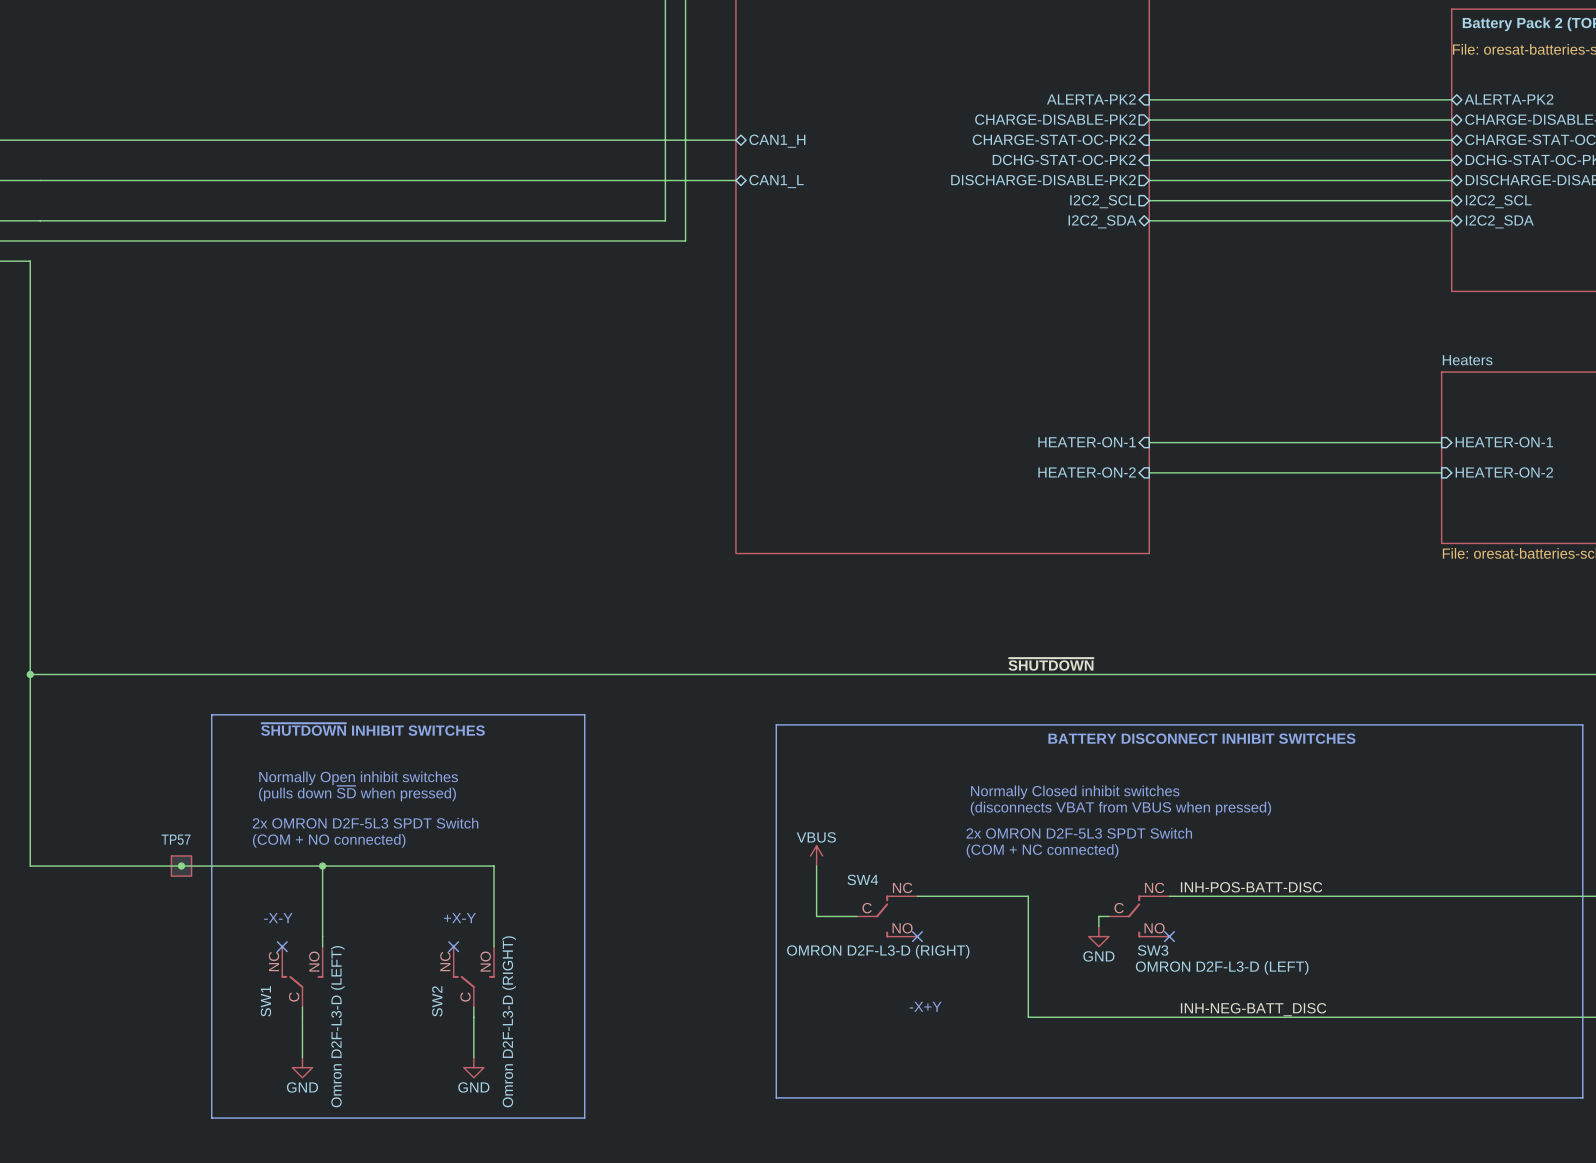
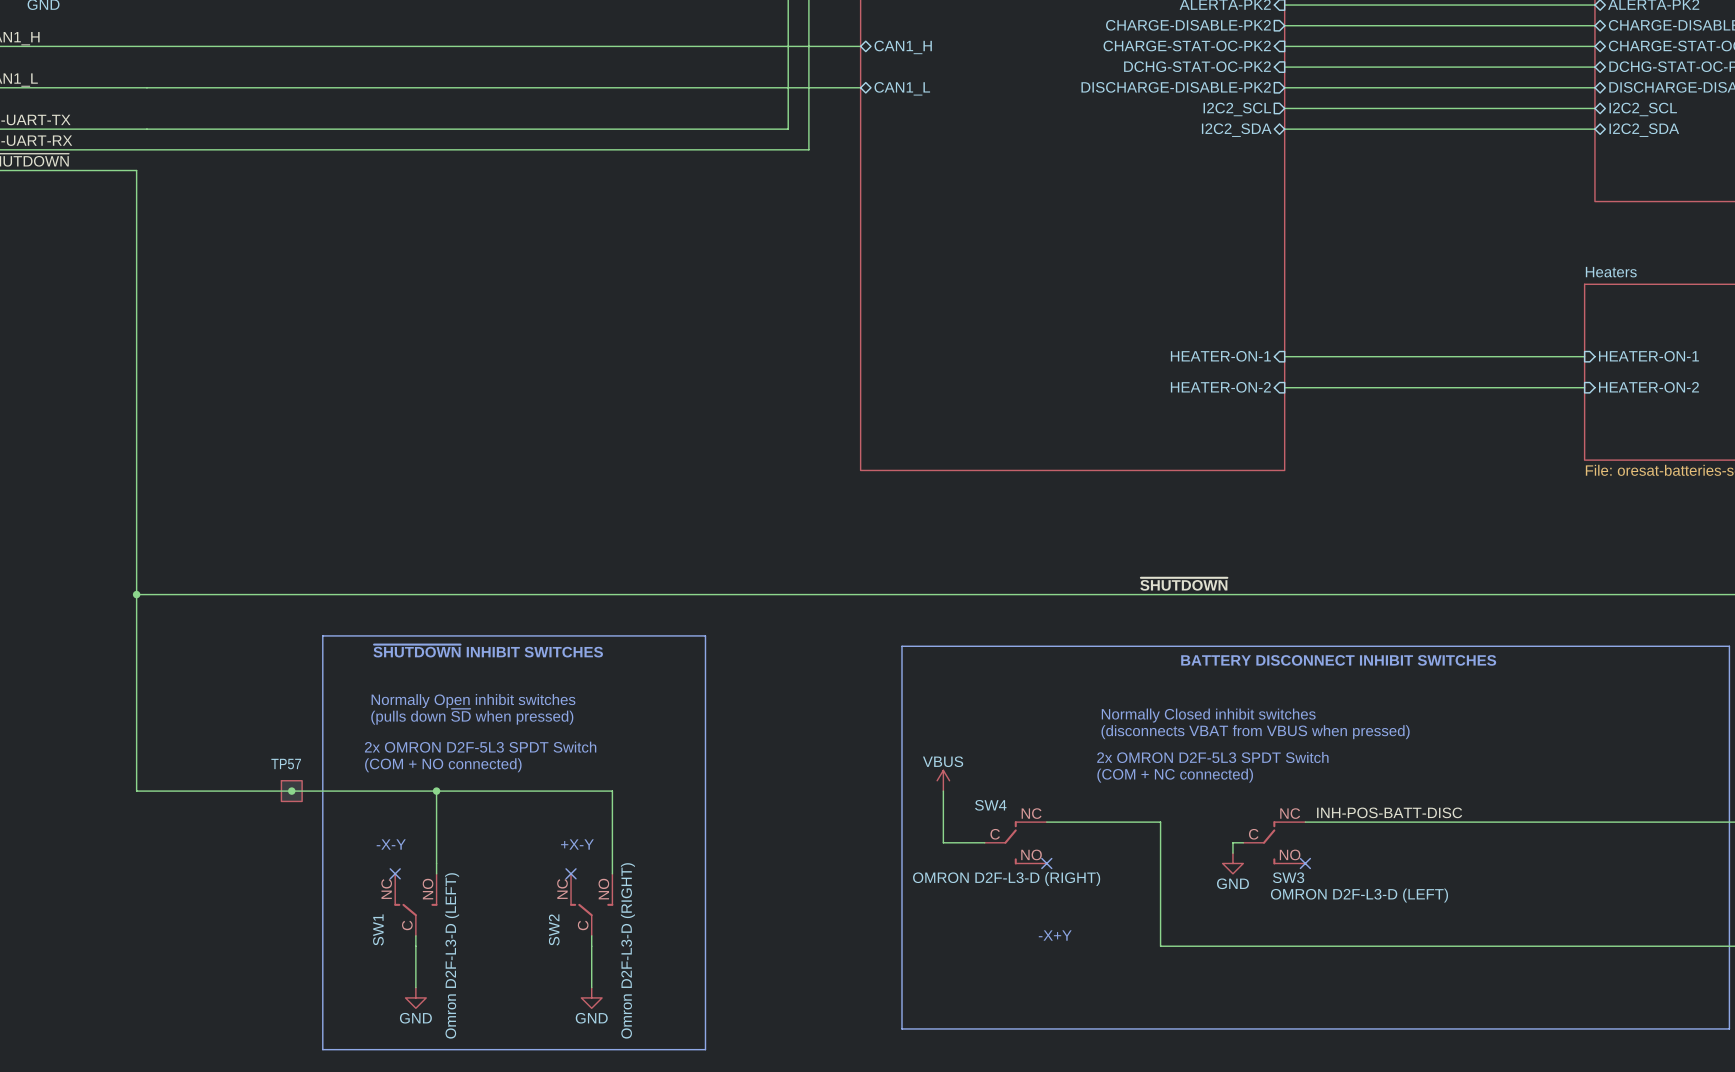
label: INH-NEG-BATT_DISC (1253, 1009) -> none

